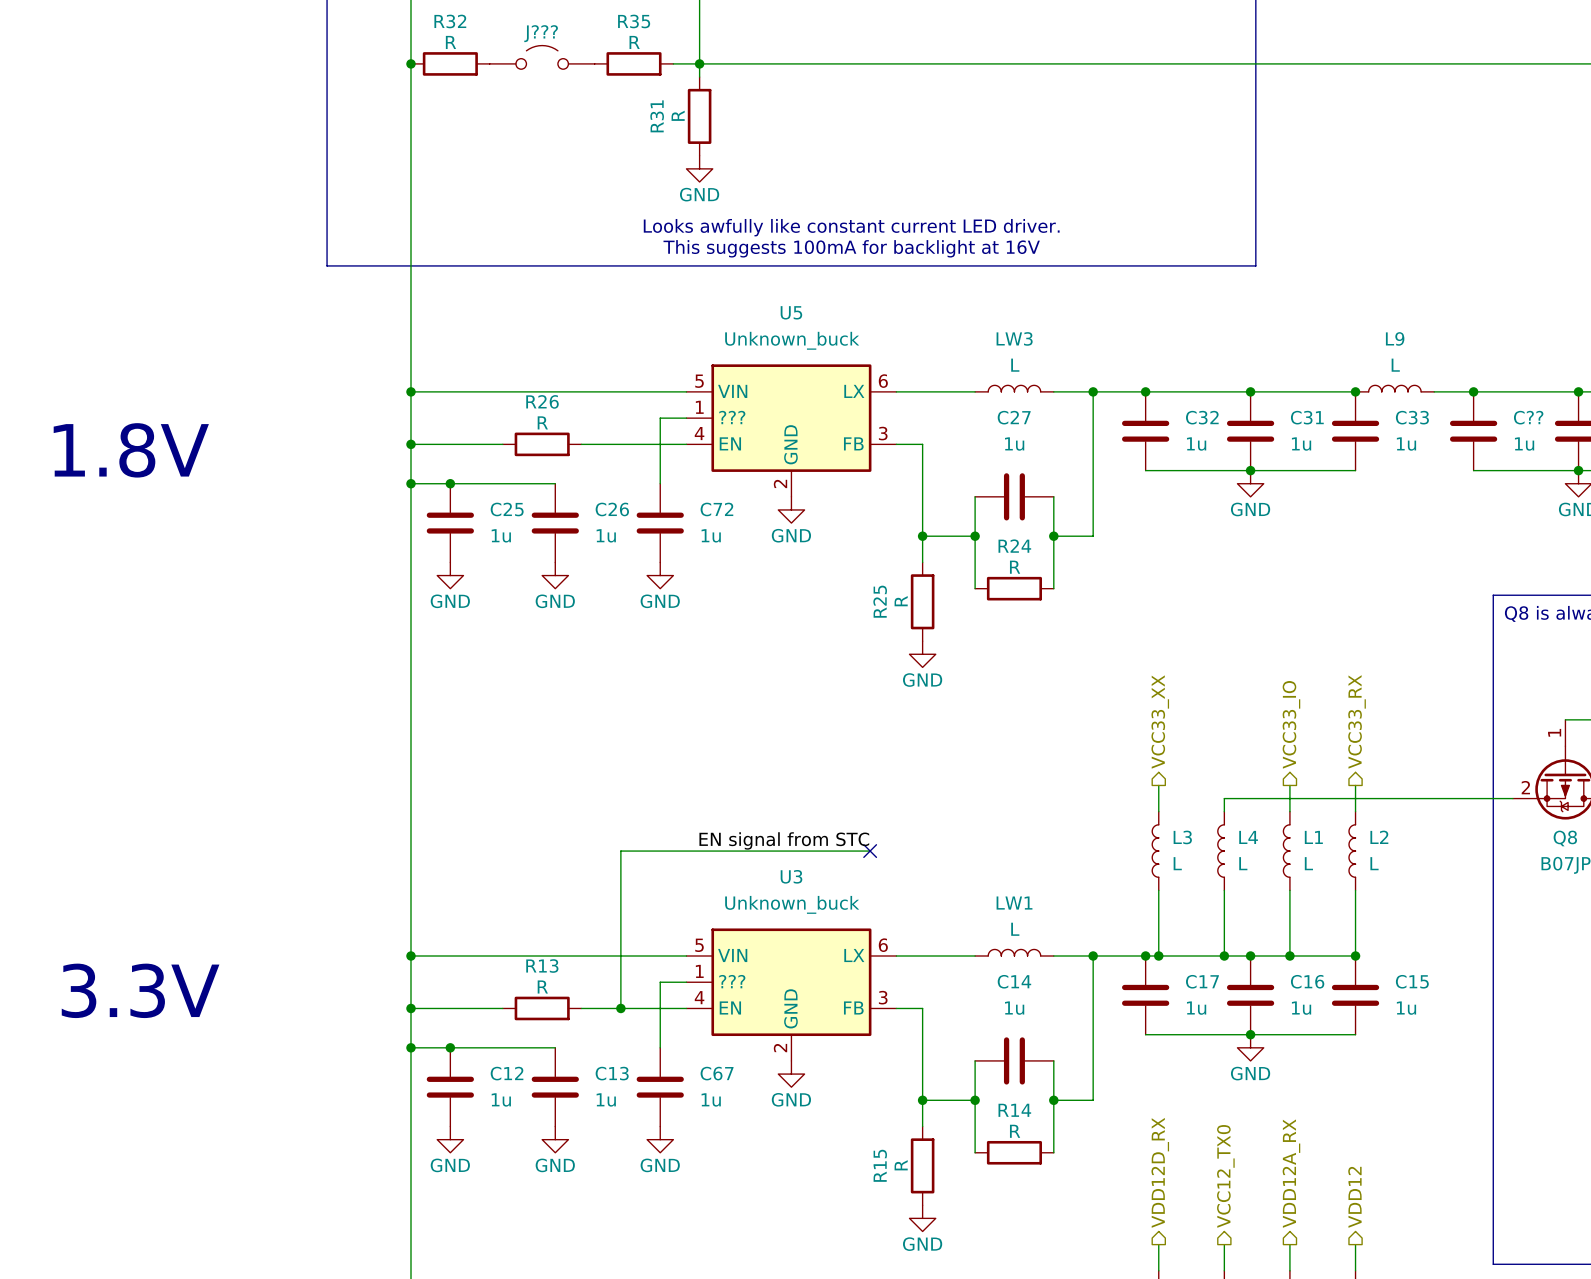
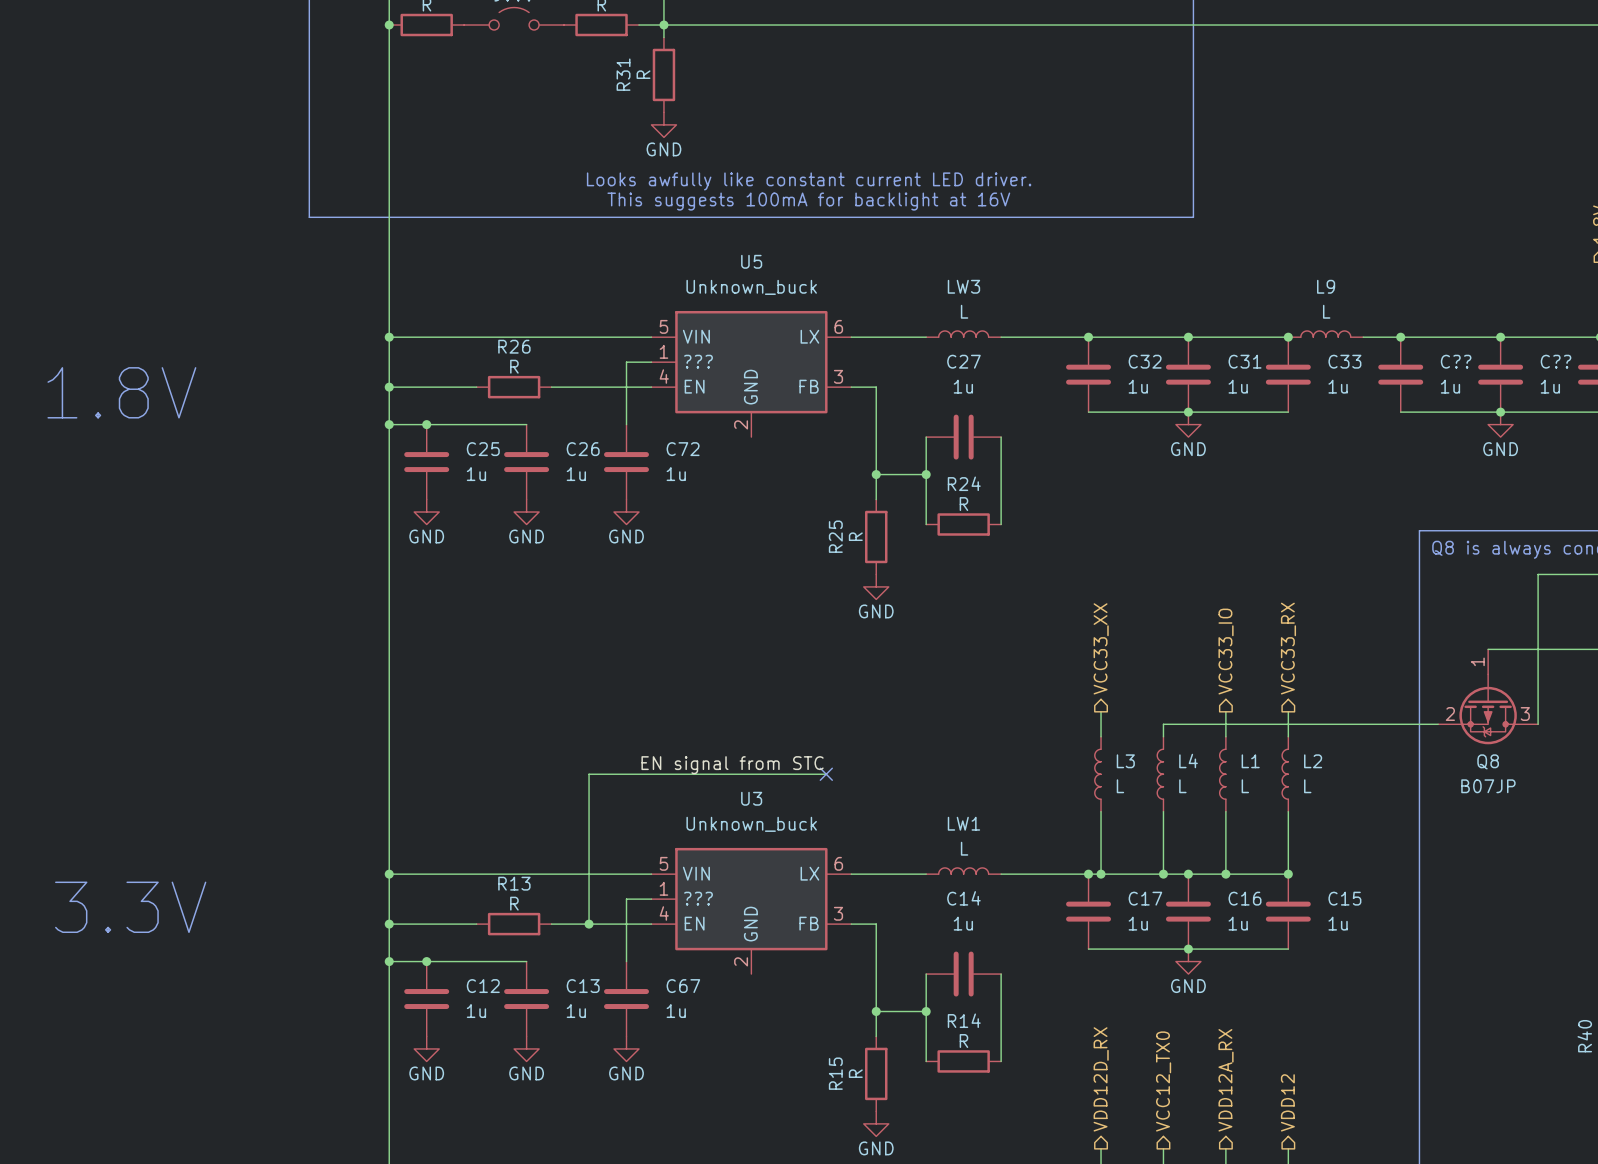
wire: (1093, 391) (1093, 536) (1053, 536) -> none
junction: (1093, 391) -> none
power symbol: GND (791, 509) -> none
junction: (1053, 536) -> none
wire: (1093, 956) (1093, 1100) (1053, 1100) -> none
junction: (1093, 956) -> none
power symbol: GND (791, 1074) -> none
junction: (1053, 1100) -> none

